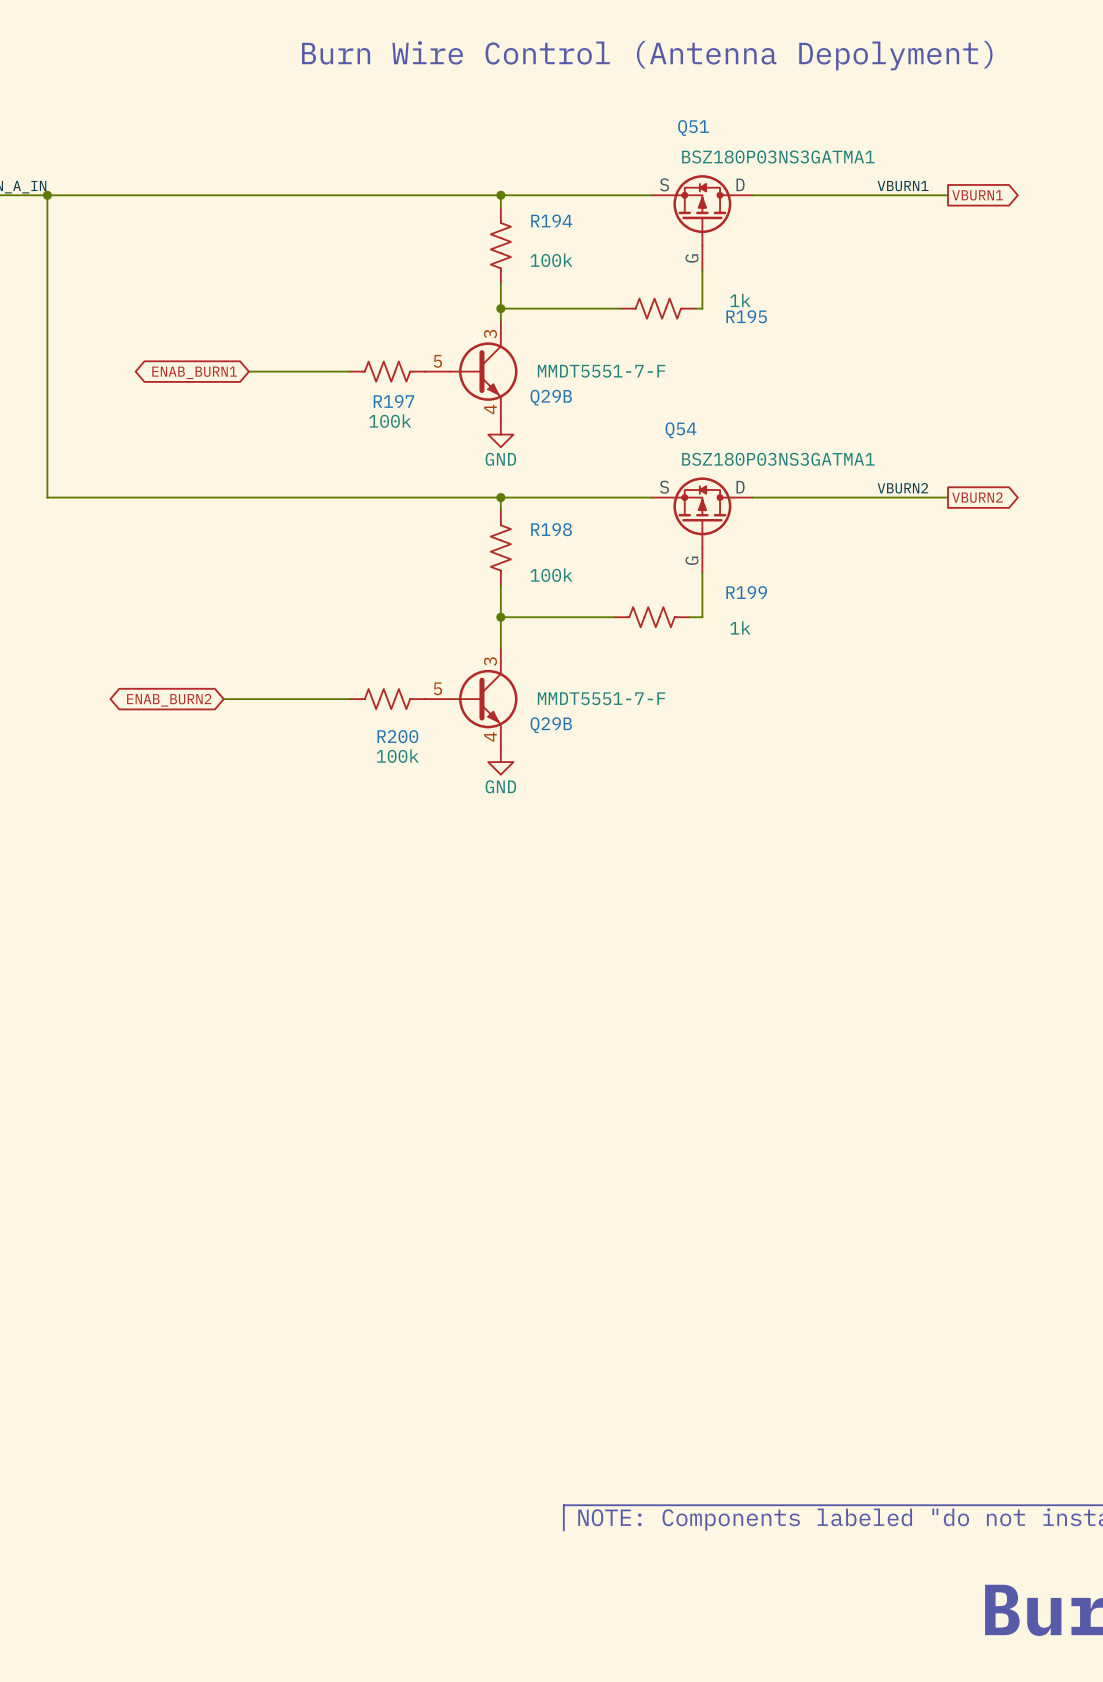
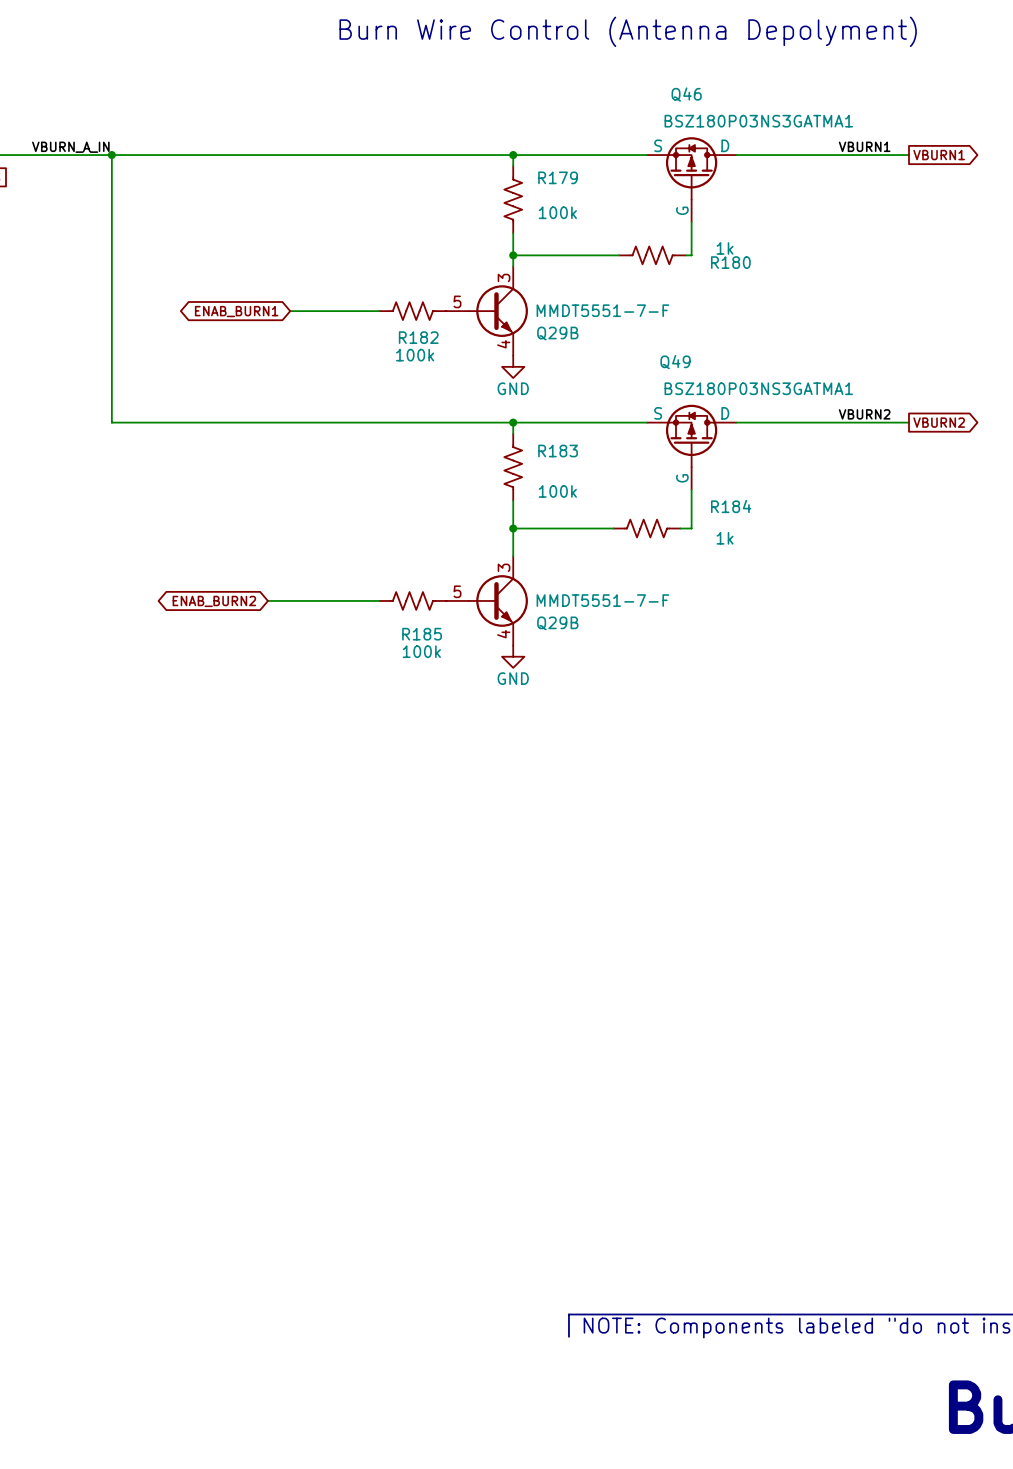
Q51 name: Q51 (693, 127) -> Q46 (686, 94)
R194 name: R194 (551, 220) -> R179 (558, 177)
R195 name: R195 (746, 316) -> R180 (730, 262)
R197 name: R197 (393, 401) -> R182 (418, 337)
Q54 name: Q54 (681, 430) -> Q49 (675, 362)
R198 name: R198 (551, 529) -> R183 (558, 451)
R199 name: R199 (746, 592) -> R184 (731, 506)
R200 name: R200 (397, 736) -> R185 (422, 634)

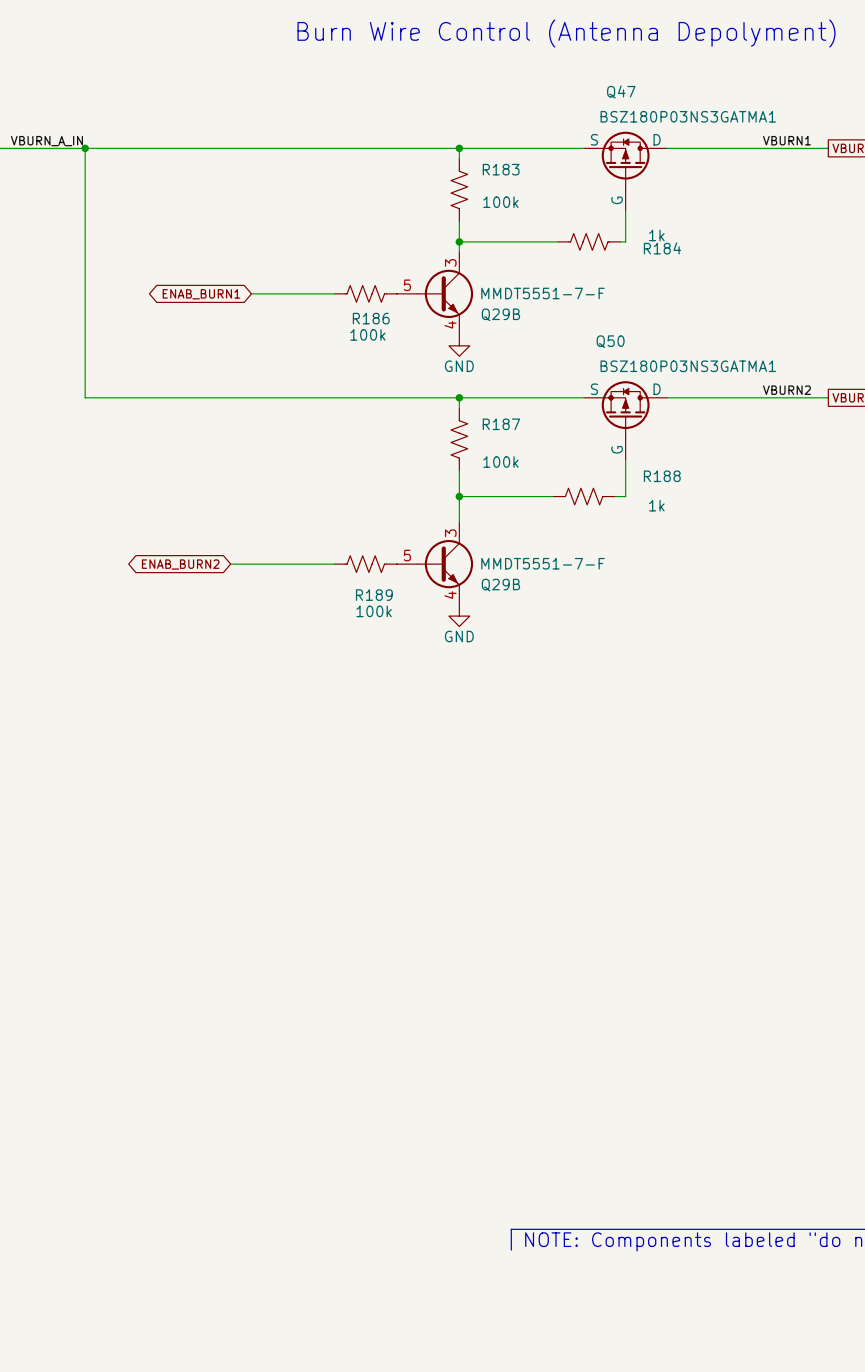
Q46 name: Q46 (686, 94) -> Q47 (621, 91)
R179 name: R179 (558, 177) -> R183 (501, 169)
R180 name: R180 (730, 262) -> R184 (662, 248)
R182 name: R182 (418, 337) -> R186 (371, 318)
Q49 name: Q49 (675, 362) -> Q50 (610, 341)
R183 name: R183 (558, 451) -> R187 (501, 424)
R184 name: R184 (731, 506) -> R188 (662, 476)
R185 name: R185 (422, 634) -> R189 (374, 595)

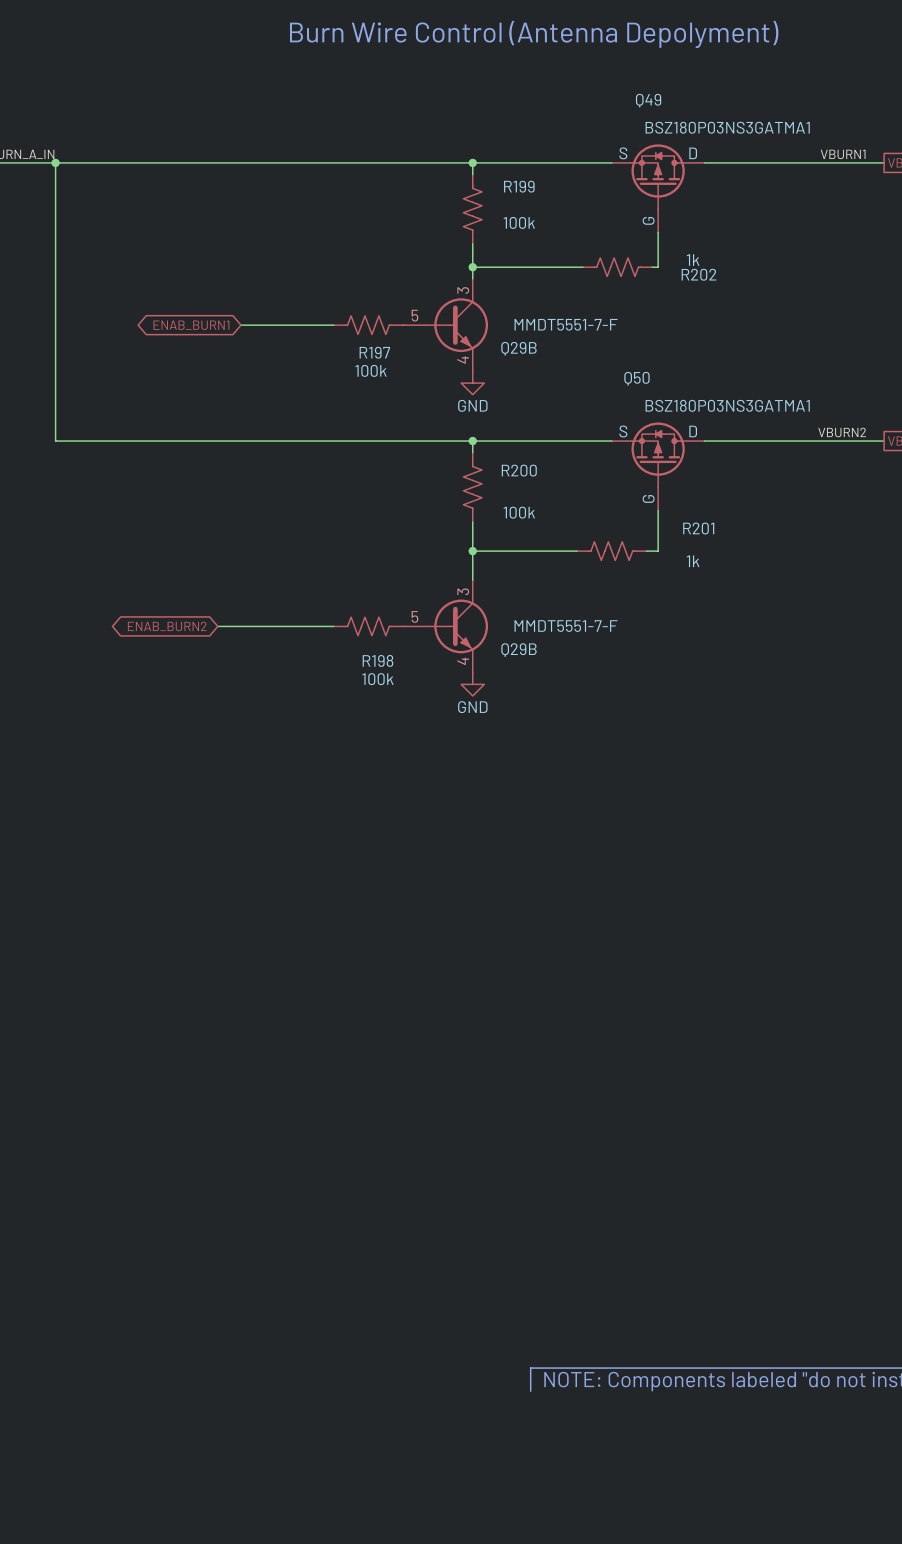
Q47 name: Q47 (621, 91) -> Q49 (648, 100)
R183 name: R183 (501, 169) -> R199 (519, 186)
R184 name: R184 (662, 248) -> R202 (699, 274)
R186 name: R186 (371, 318) -> R197 (374, 352)
R187 name: R187 (501, 424) -> R200 (519, 470)
R188 name: R188 (662, 476) -> R201 (698, 528)
R189 name: R189 (374, 595) -> R198 (378, 660)

